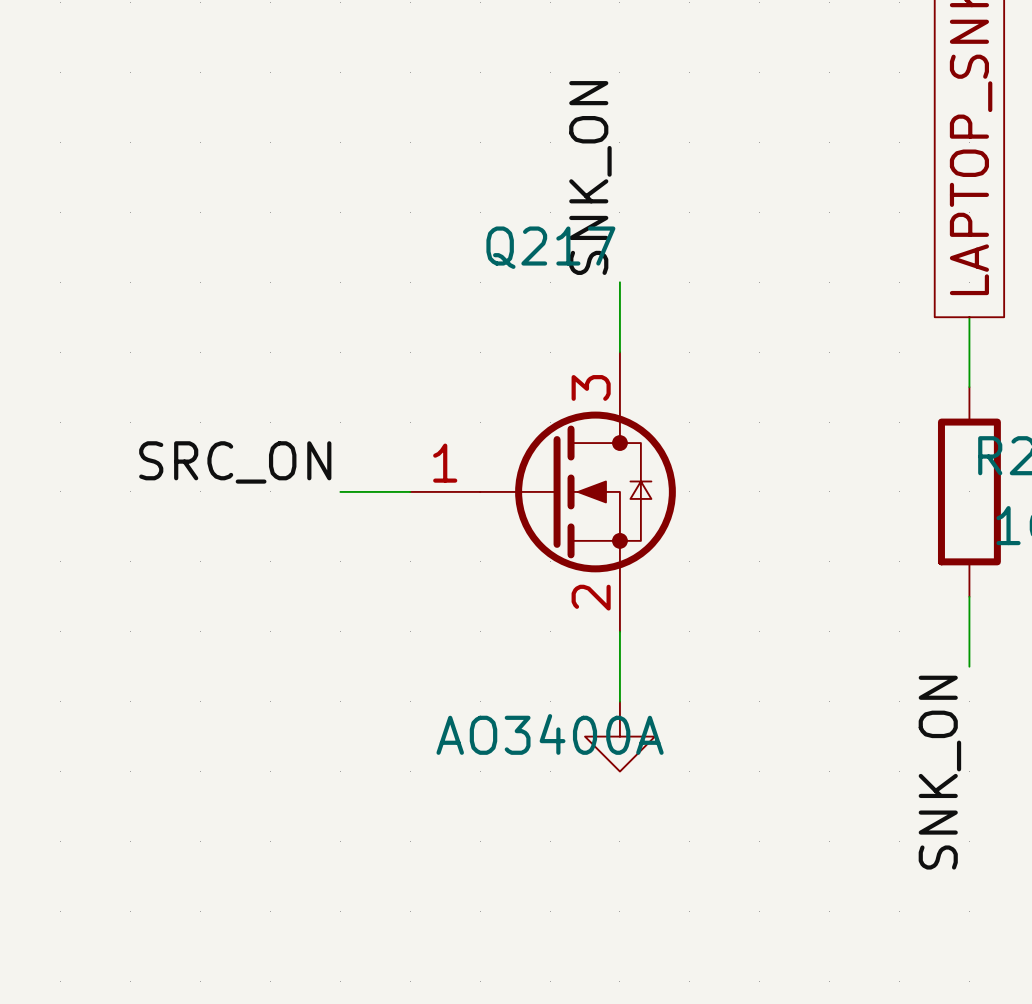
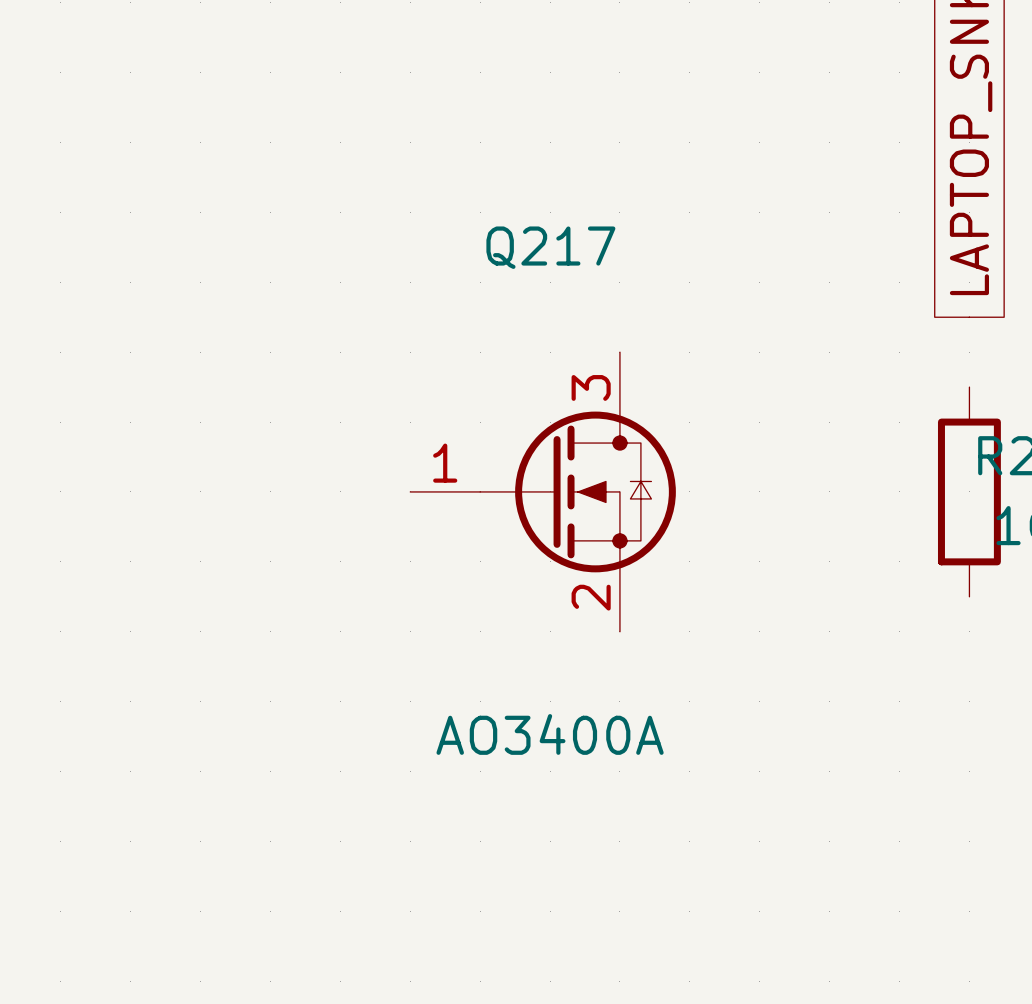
label: SNK_ON (590, 178) -> none
wire: (619, 282) (619, 352) -> none
wire: (969, 317) (969, 387) -> none
label: SRC_ON (235, 462) -> none
wire: (340, 491) (410, 491) -> none
wire: (969, 596) (969, 666) -> none
wire: (619, 631) (619, 701) -> none
power symbol: (619, 736) -> none
label: SNK_ON (939, 772) -> none

